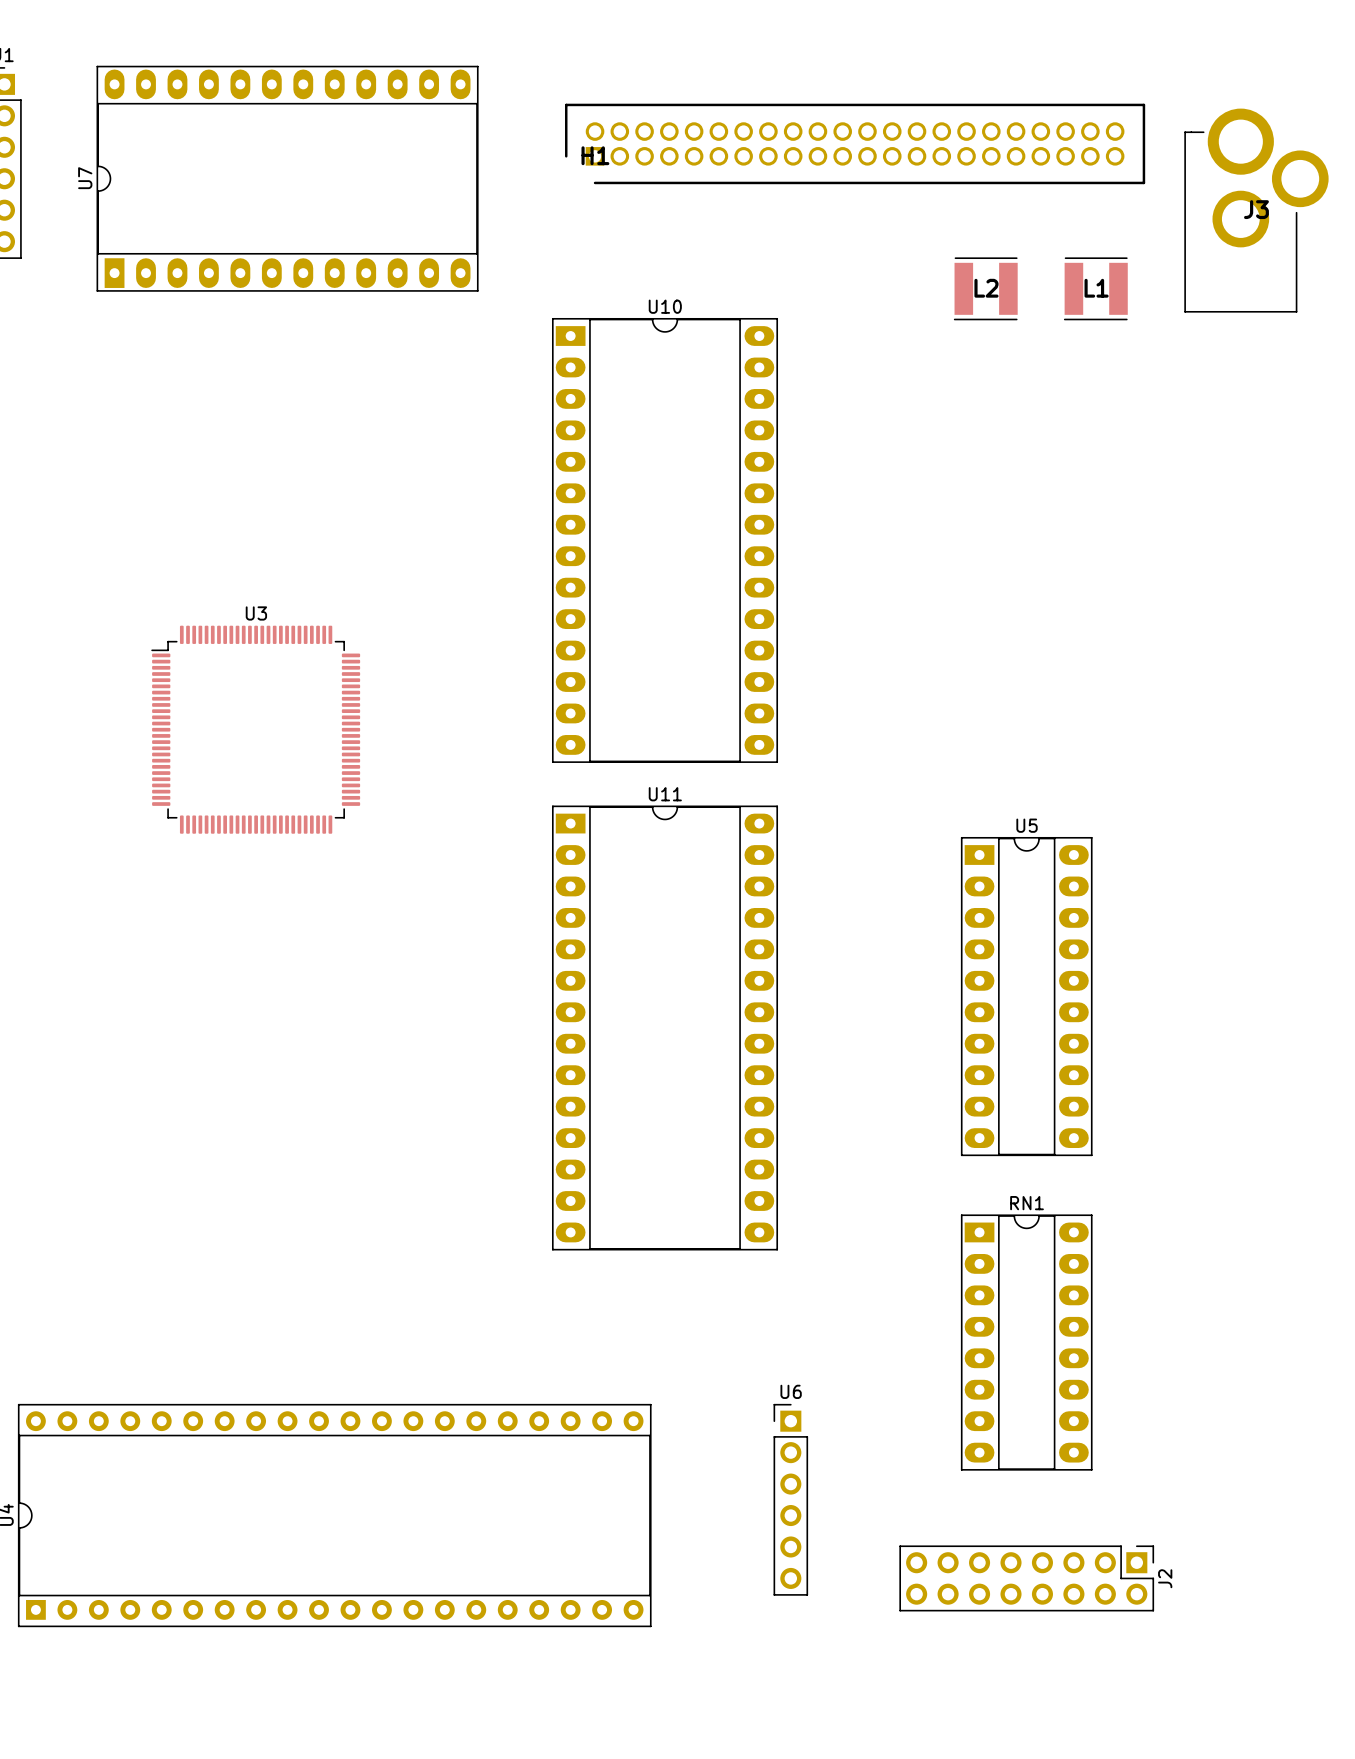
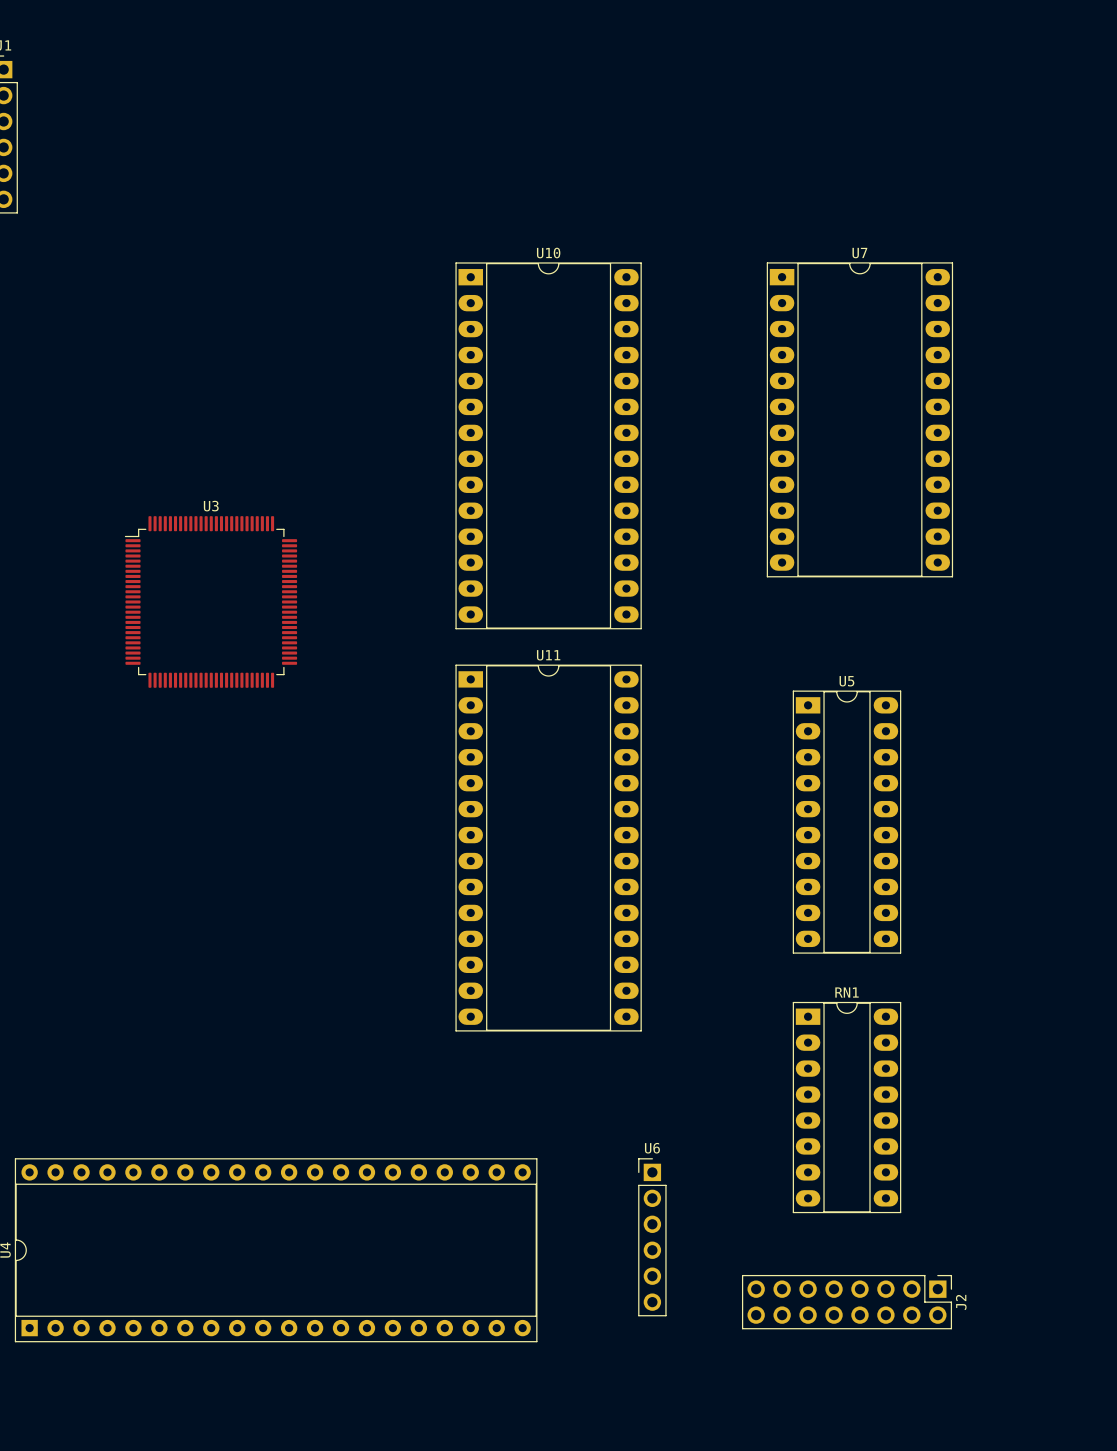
H1: (855, 143) -> none
U7 rotation: 0° (287, 178) -> 90° clockwise (859, 419)
U7 position: (287, 178) -> (859, 419)
J3: (1256, 210) -> none
L2: (985, 288) -> none
L1: (1095, 288) -> none

